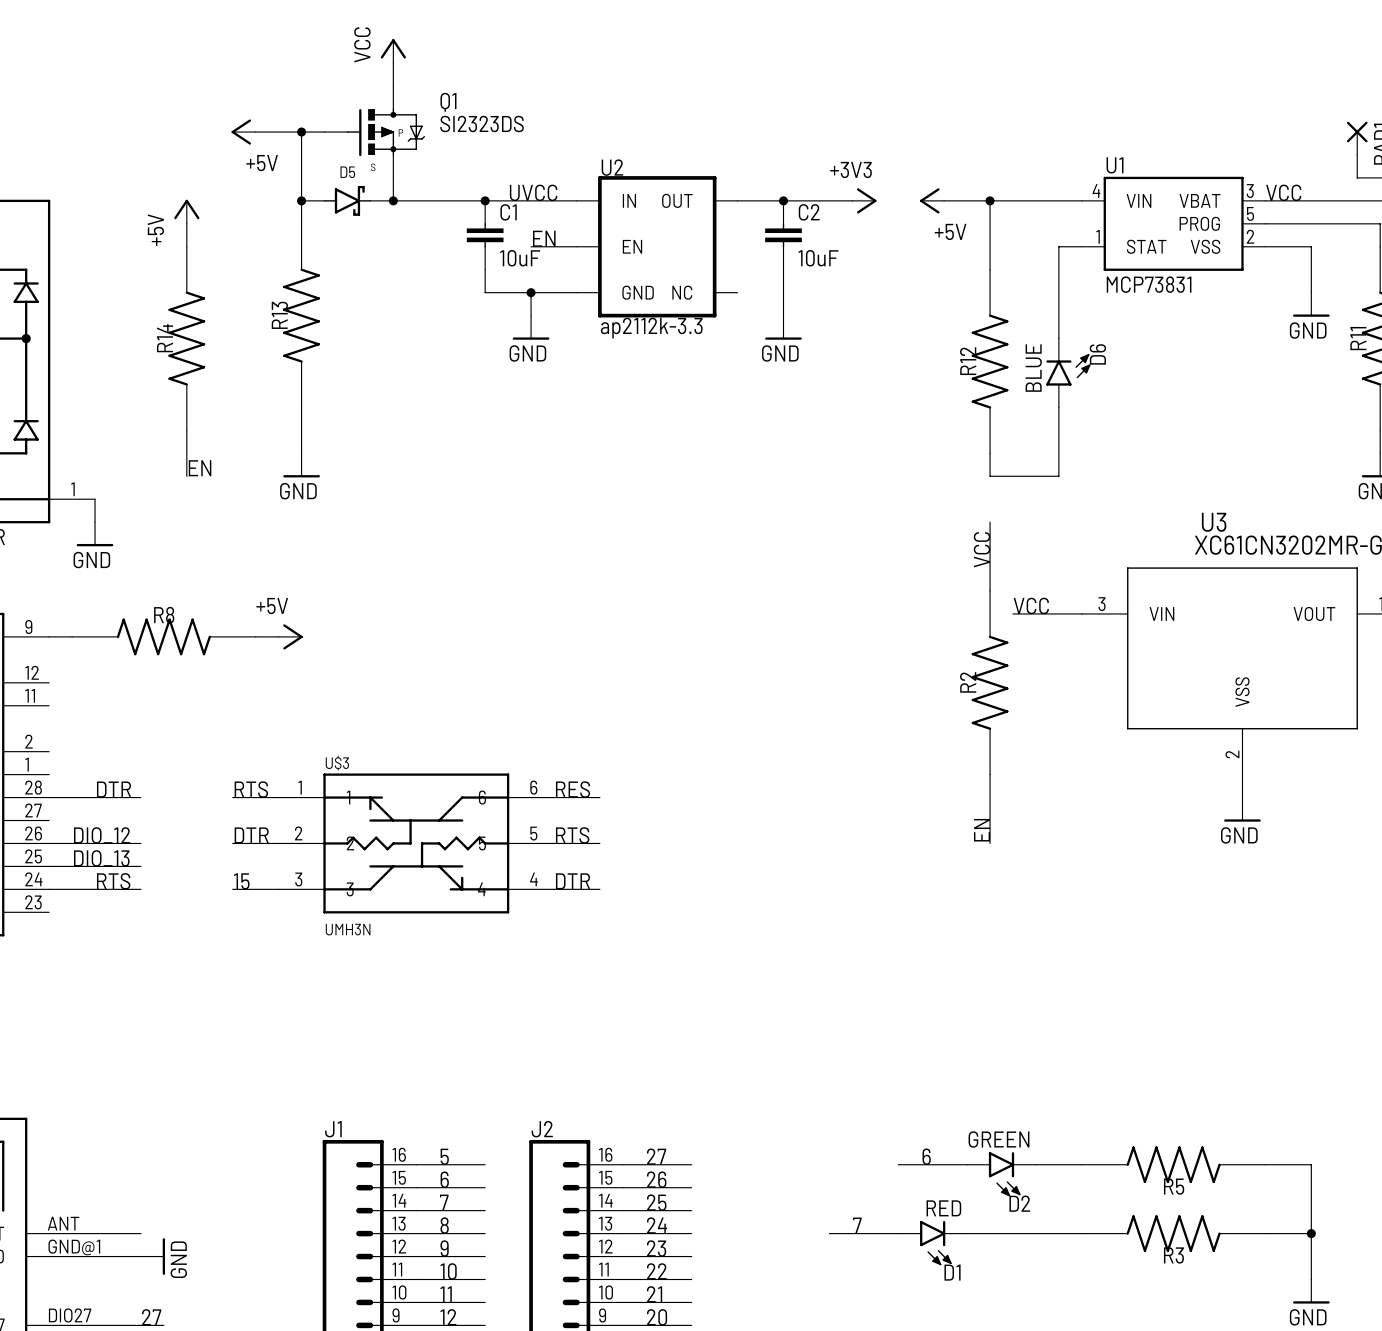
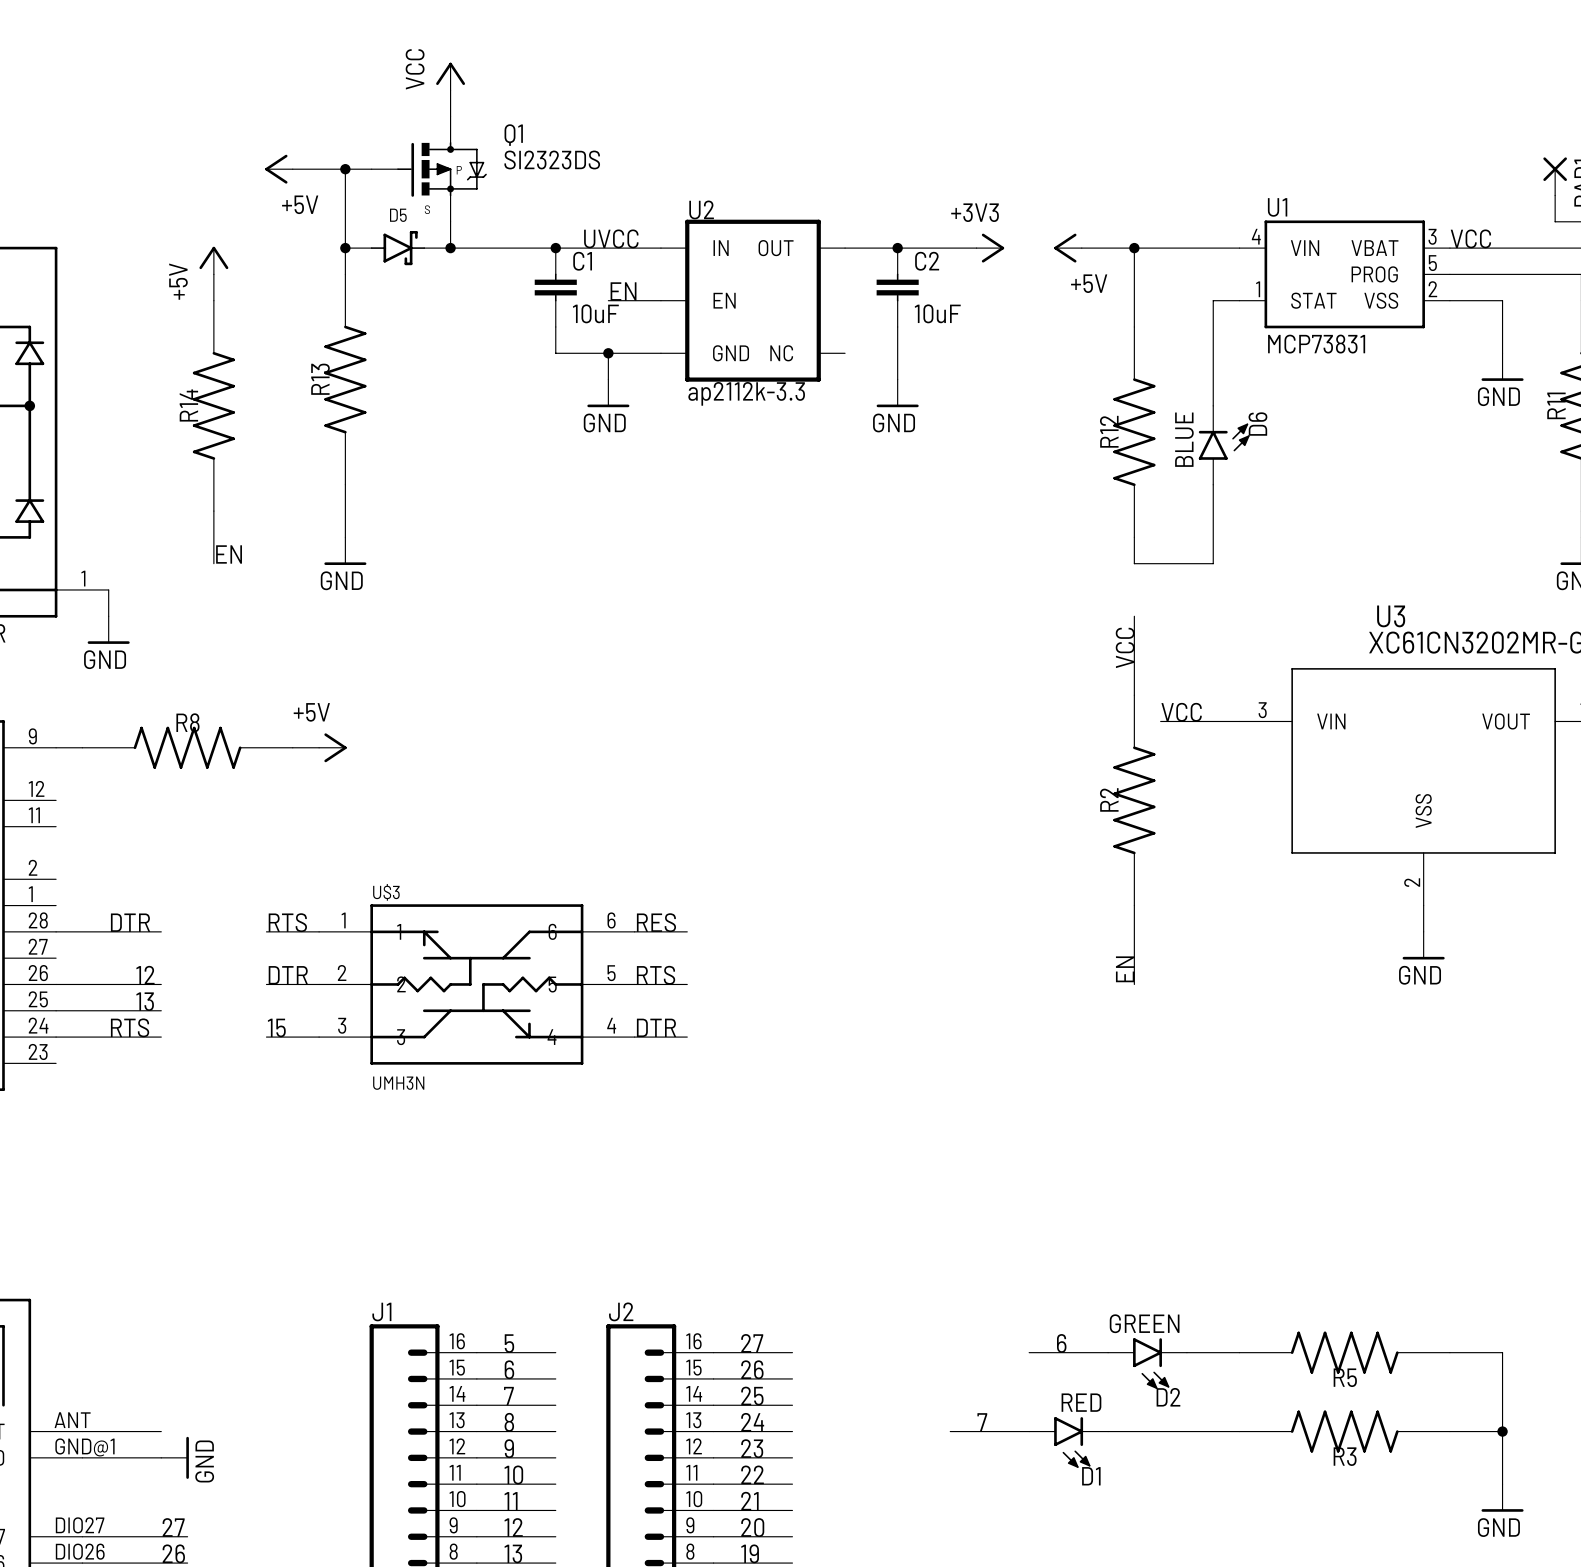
label: DIO_12 (102, 835) -> none
label: none -> 12 (145, 975)
label: DIO_13 (101, 858) -> none
label: none -> 13 (145, 1001)

